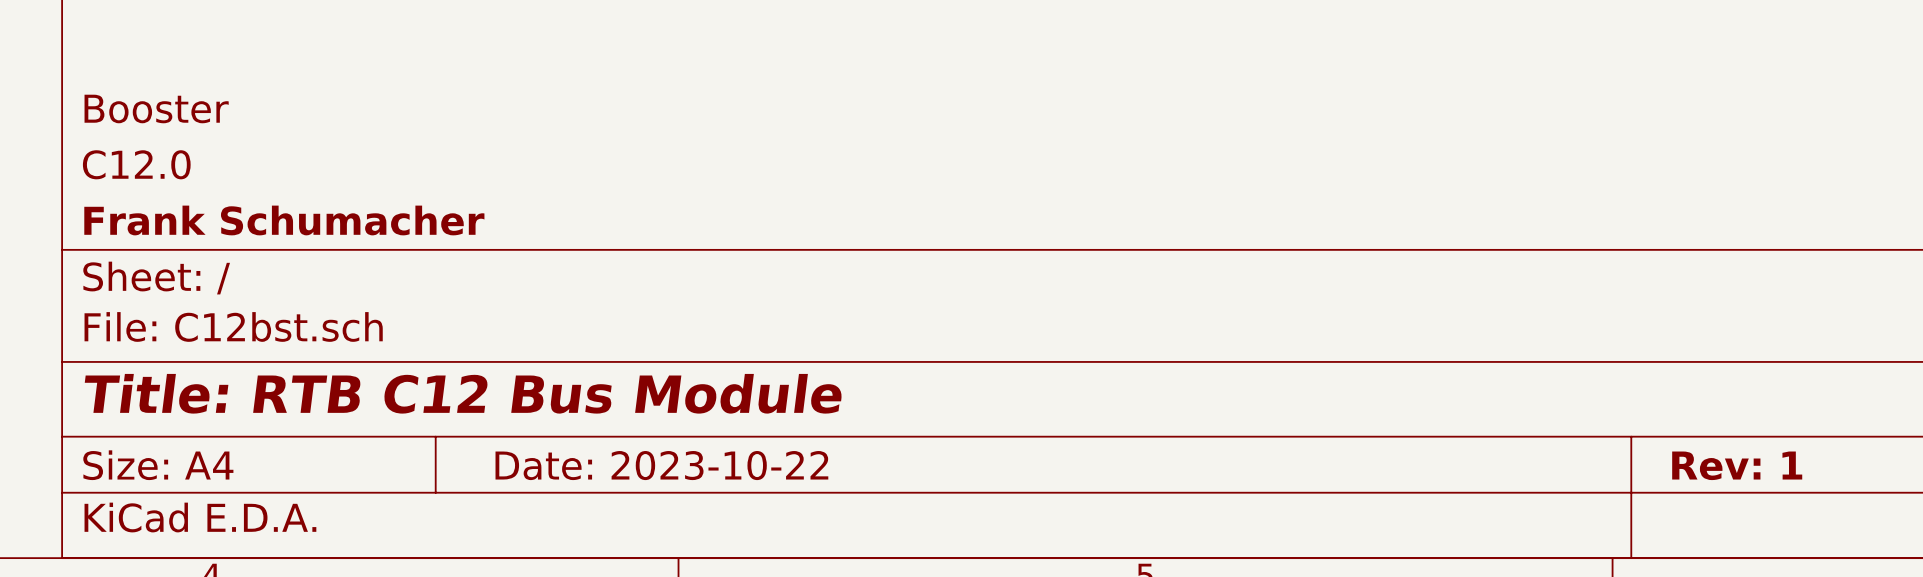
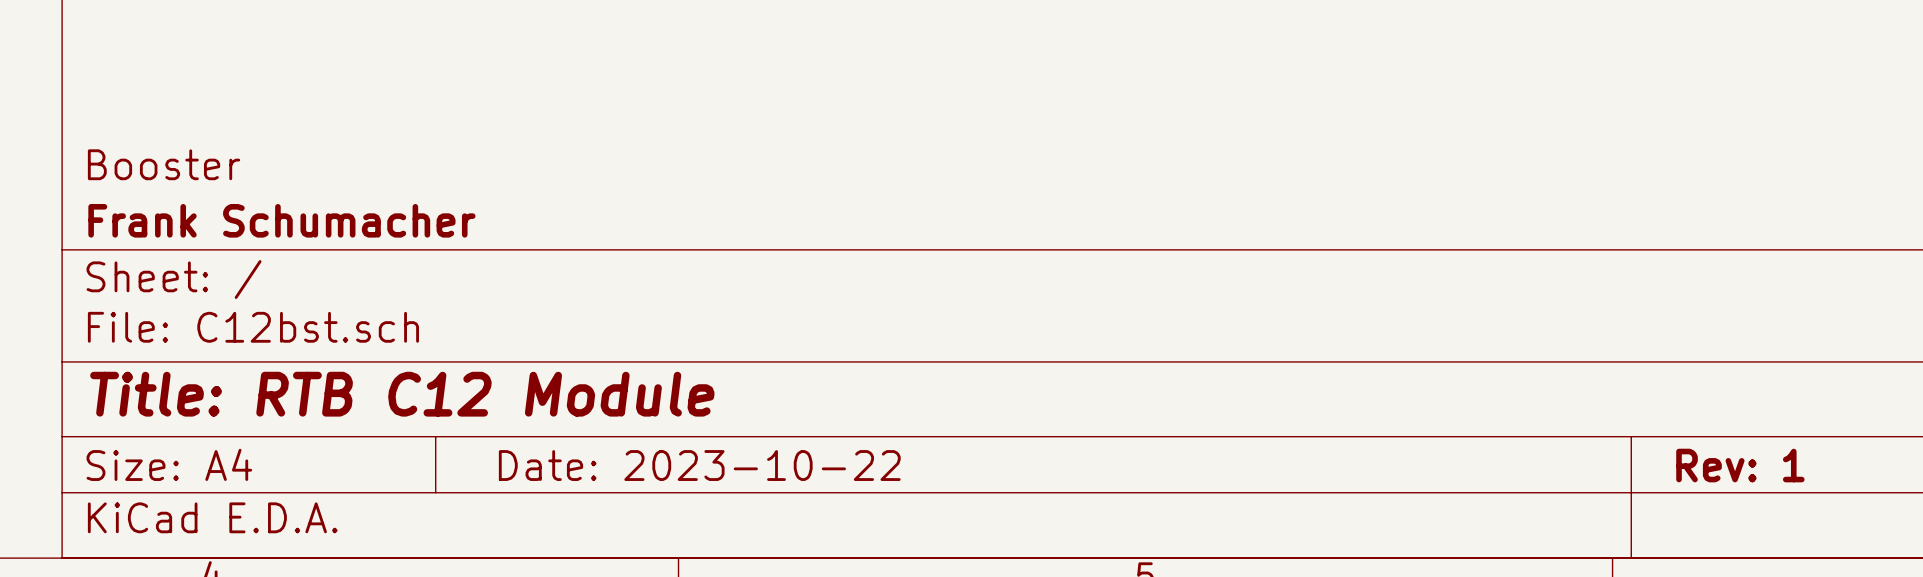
title block: Booster (156, 108) -> none
title block: C12.0 (136, 164) -> Booster (164, 164)
title block: Title: RTB C12 Bus Module (463, 393) -> Title: RTB C12 Module (402, 394)

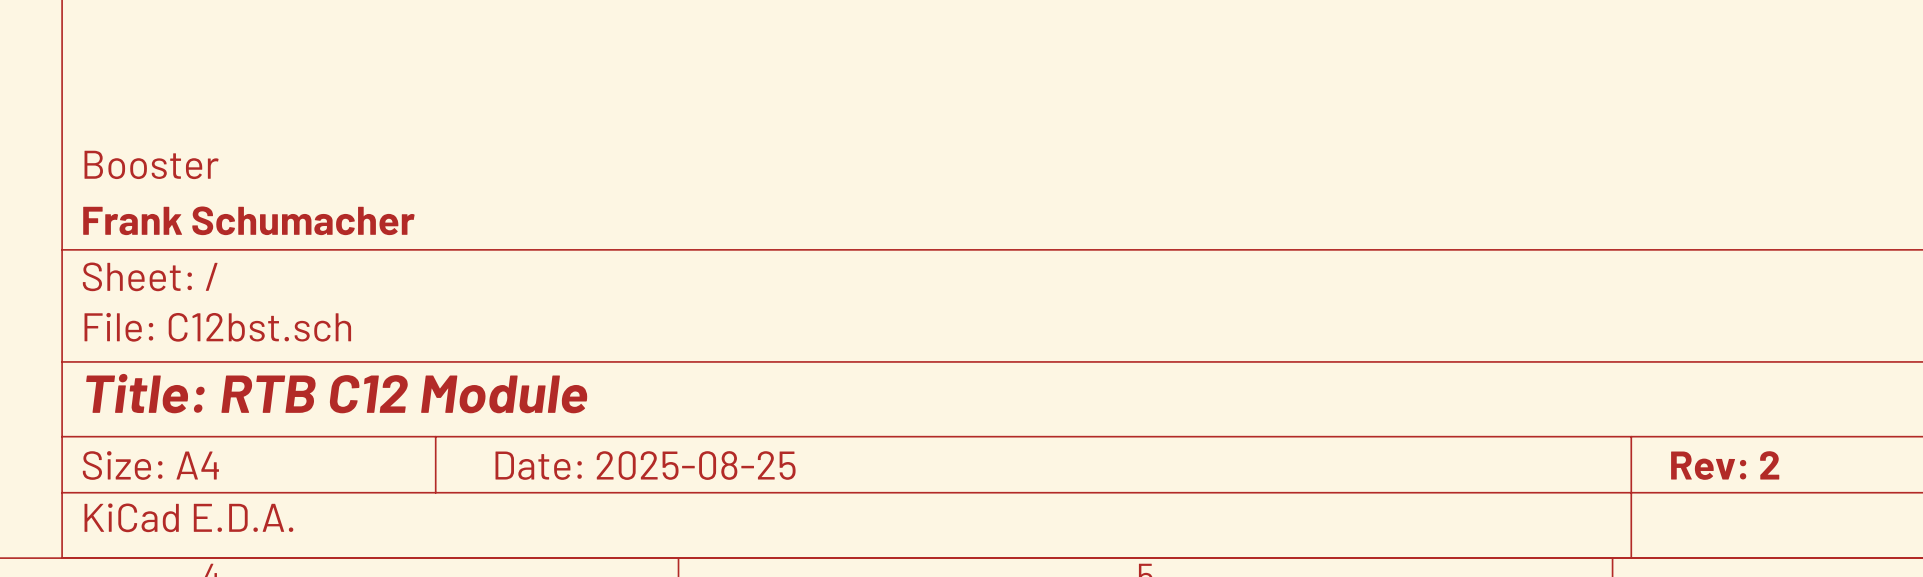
title block: Date: 2023-10-22 (699, 465) -> Date: 2025-08-25 (645, 465)
title block: Rev: 1 (1740, 465) -> Rev: 2 (1725, 465)

